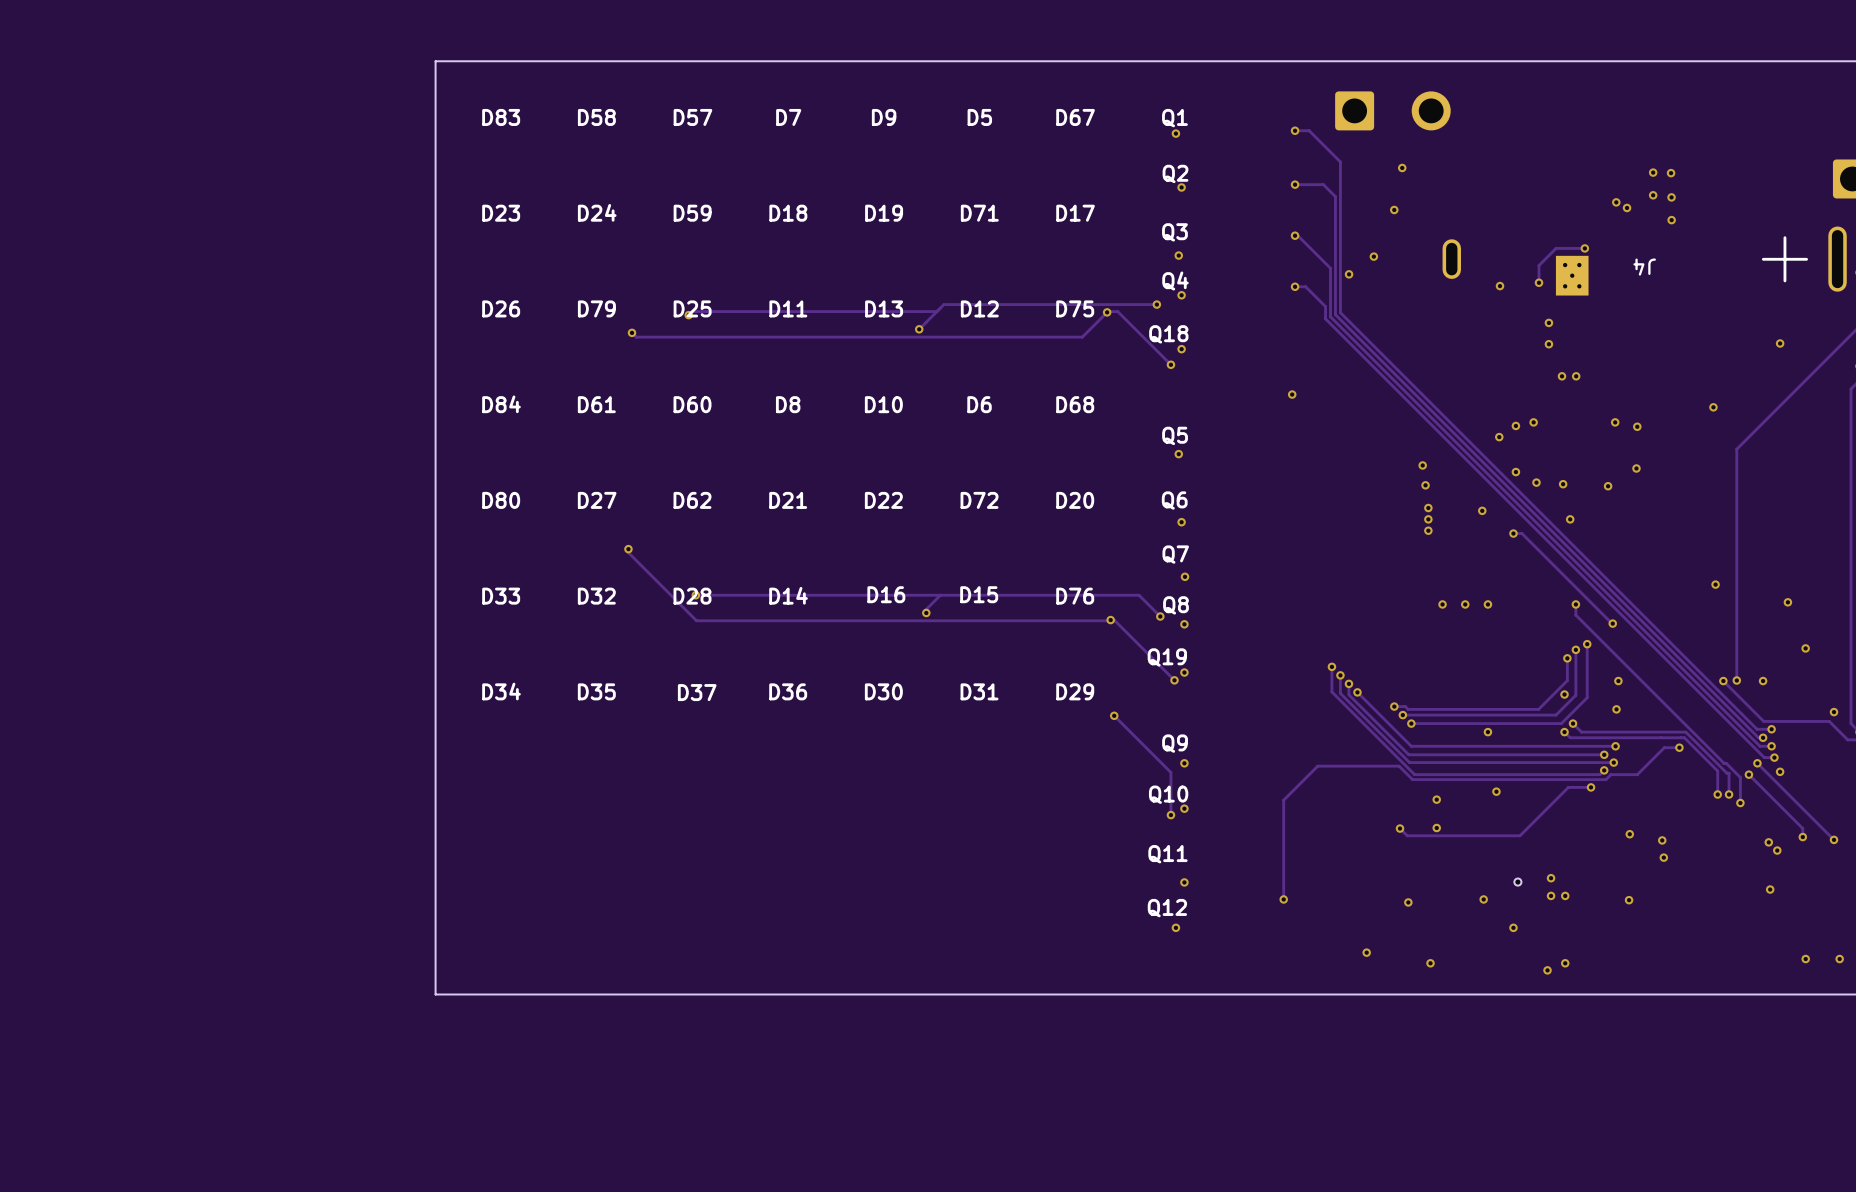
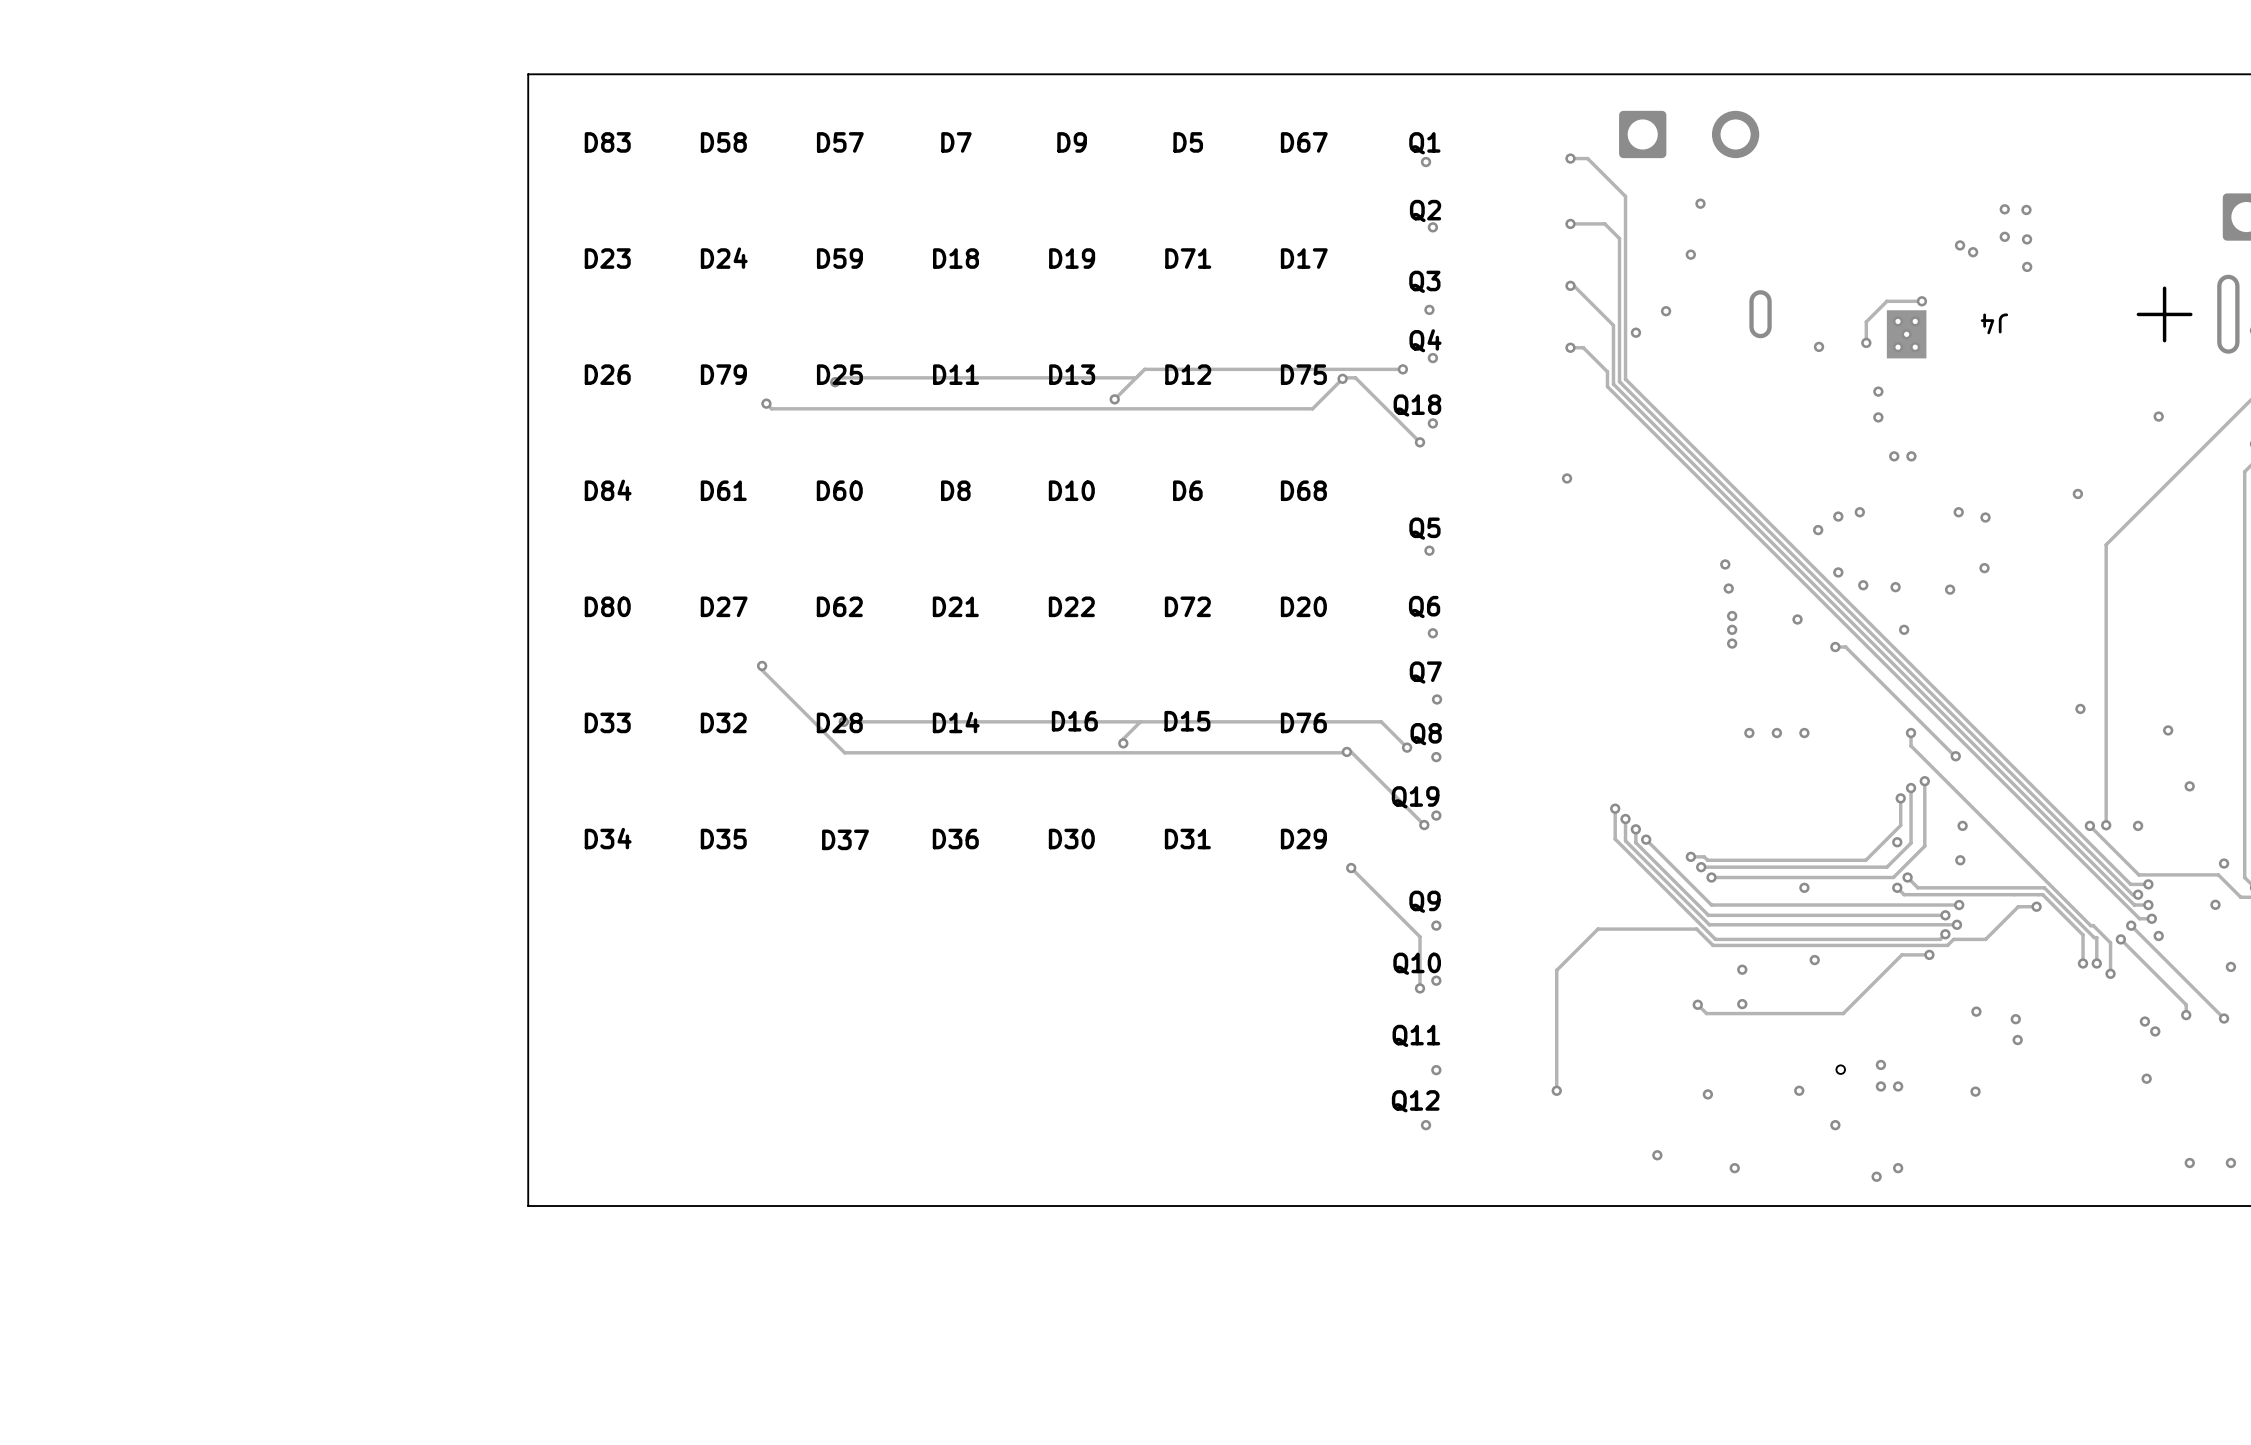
via: none -> (2215, 904)
via: none -> (2230, 966)

